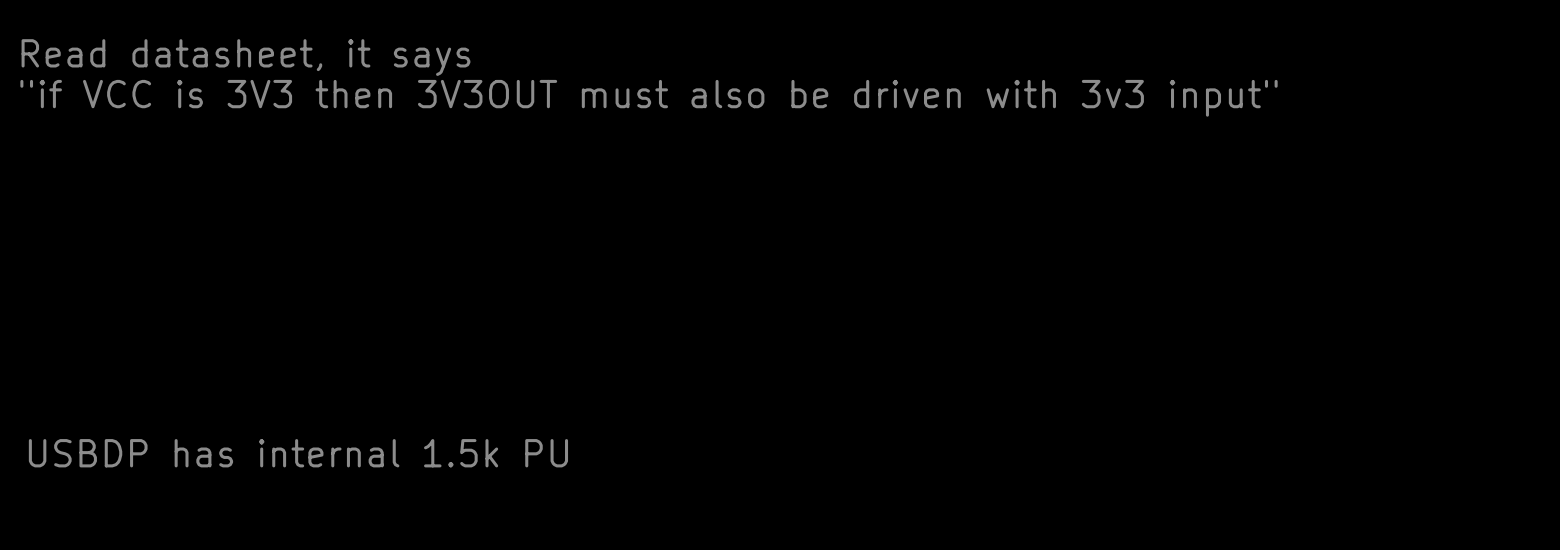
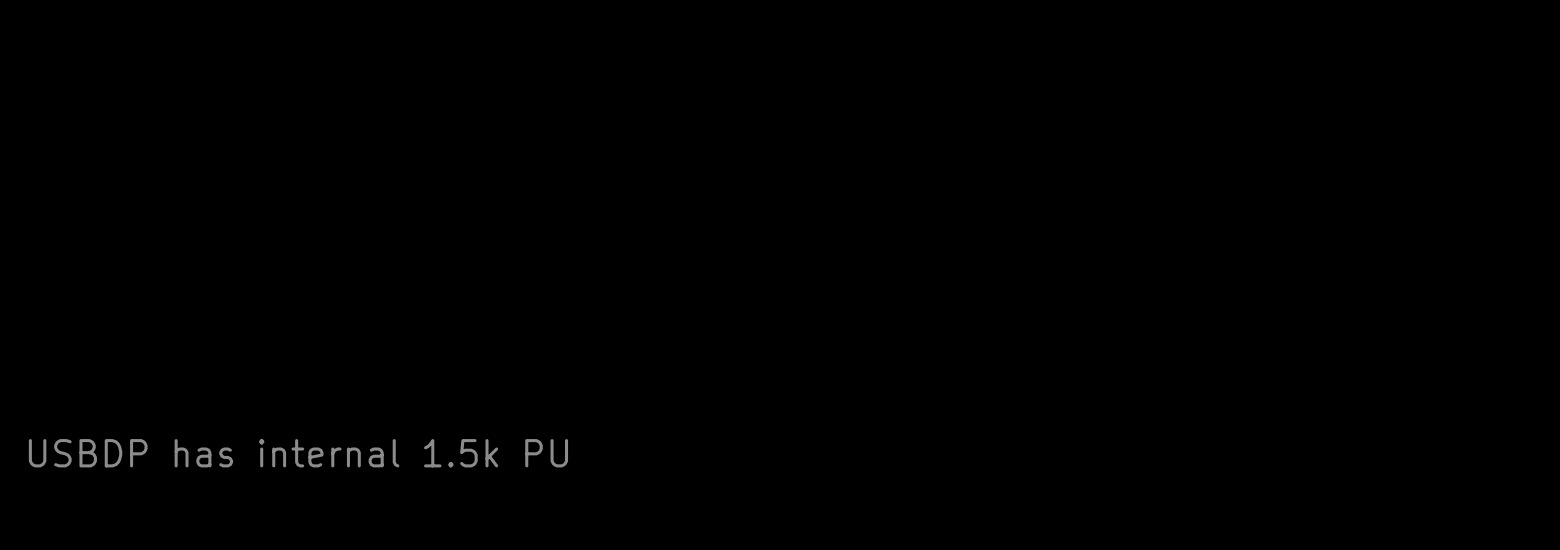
text: Read datasheet, it says (245, 57) -> none
text: "if VCC is 3V3 then 3V3OUT must also be driven with 3v3 input" (649, 98) -> none

